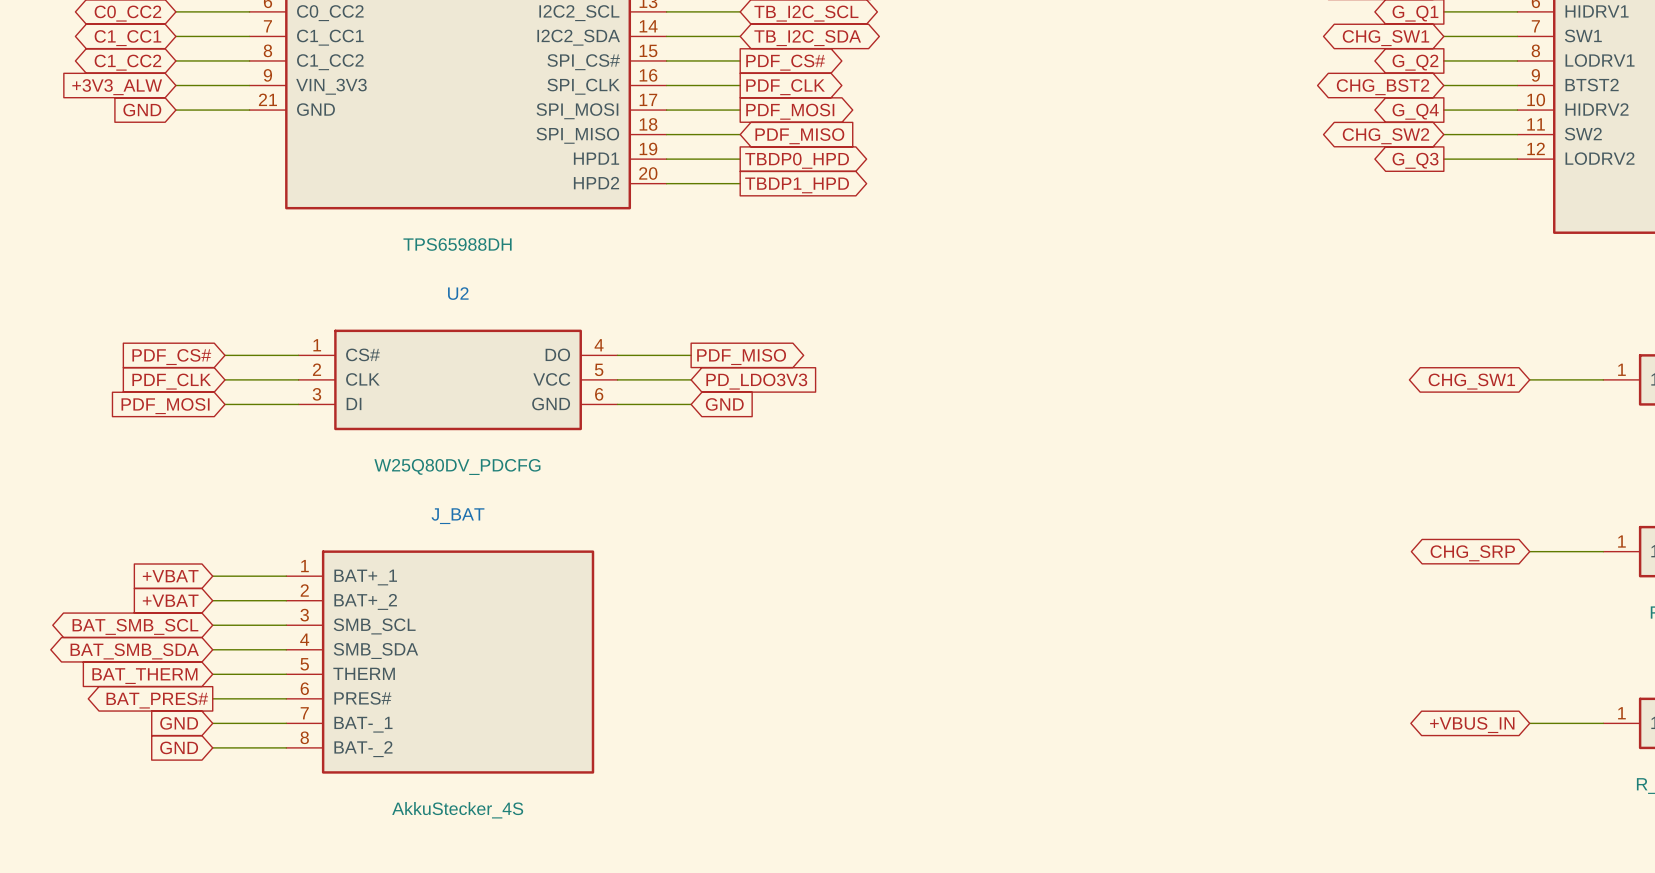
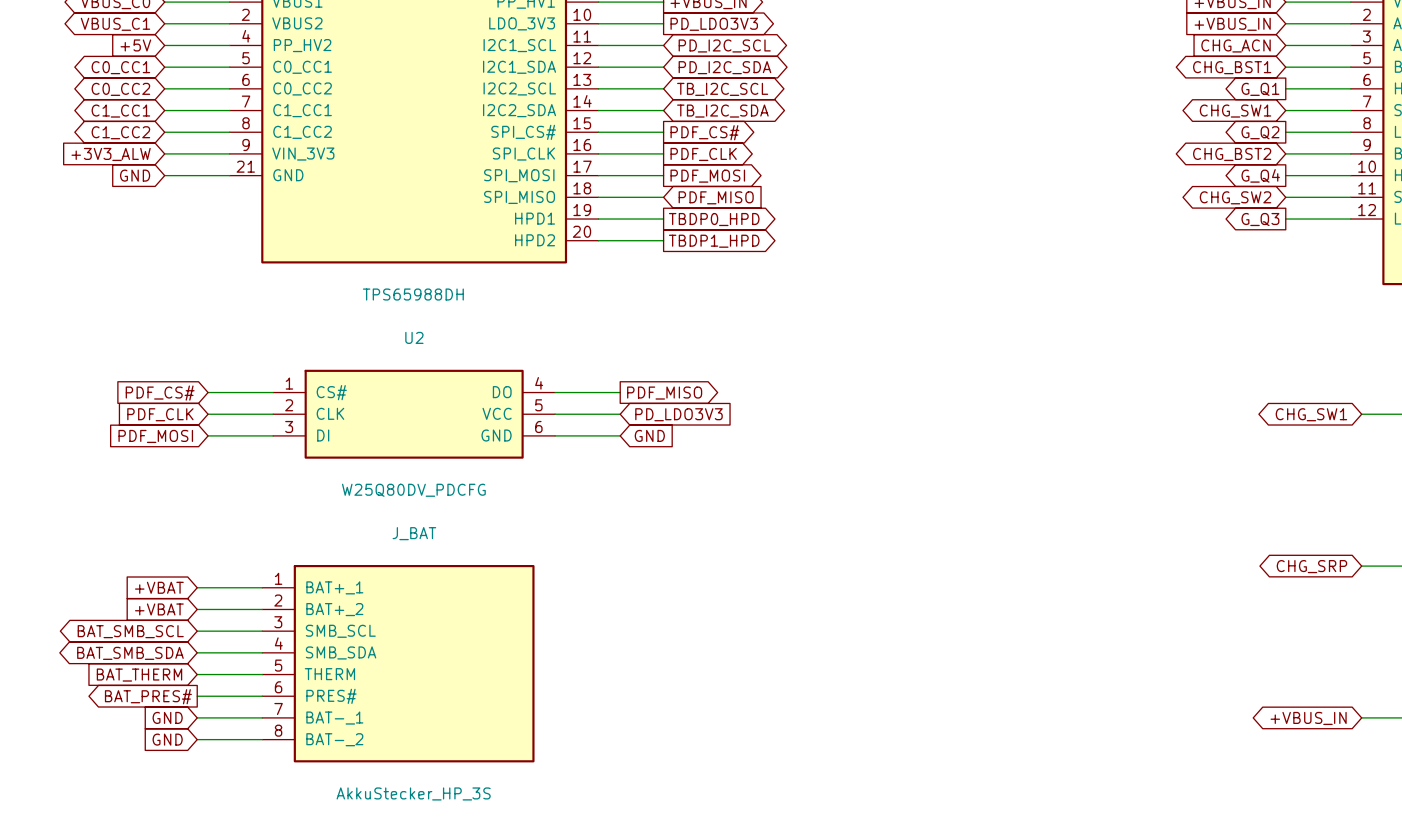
J_BAT value: AkkuStecker_4S (457, 810) -> AkkuStecker_HP_3S (413, 793)

